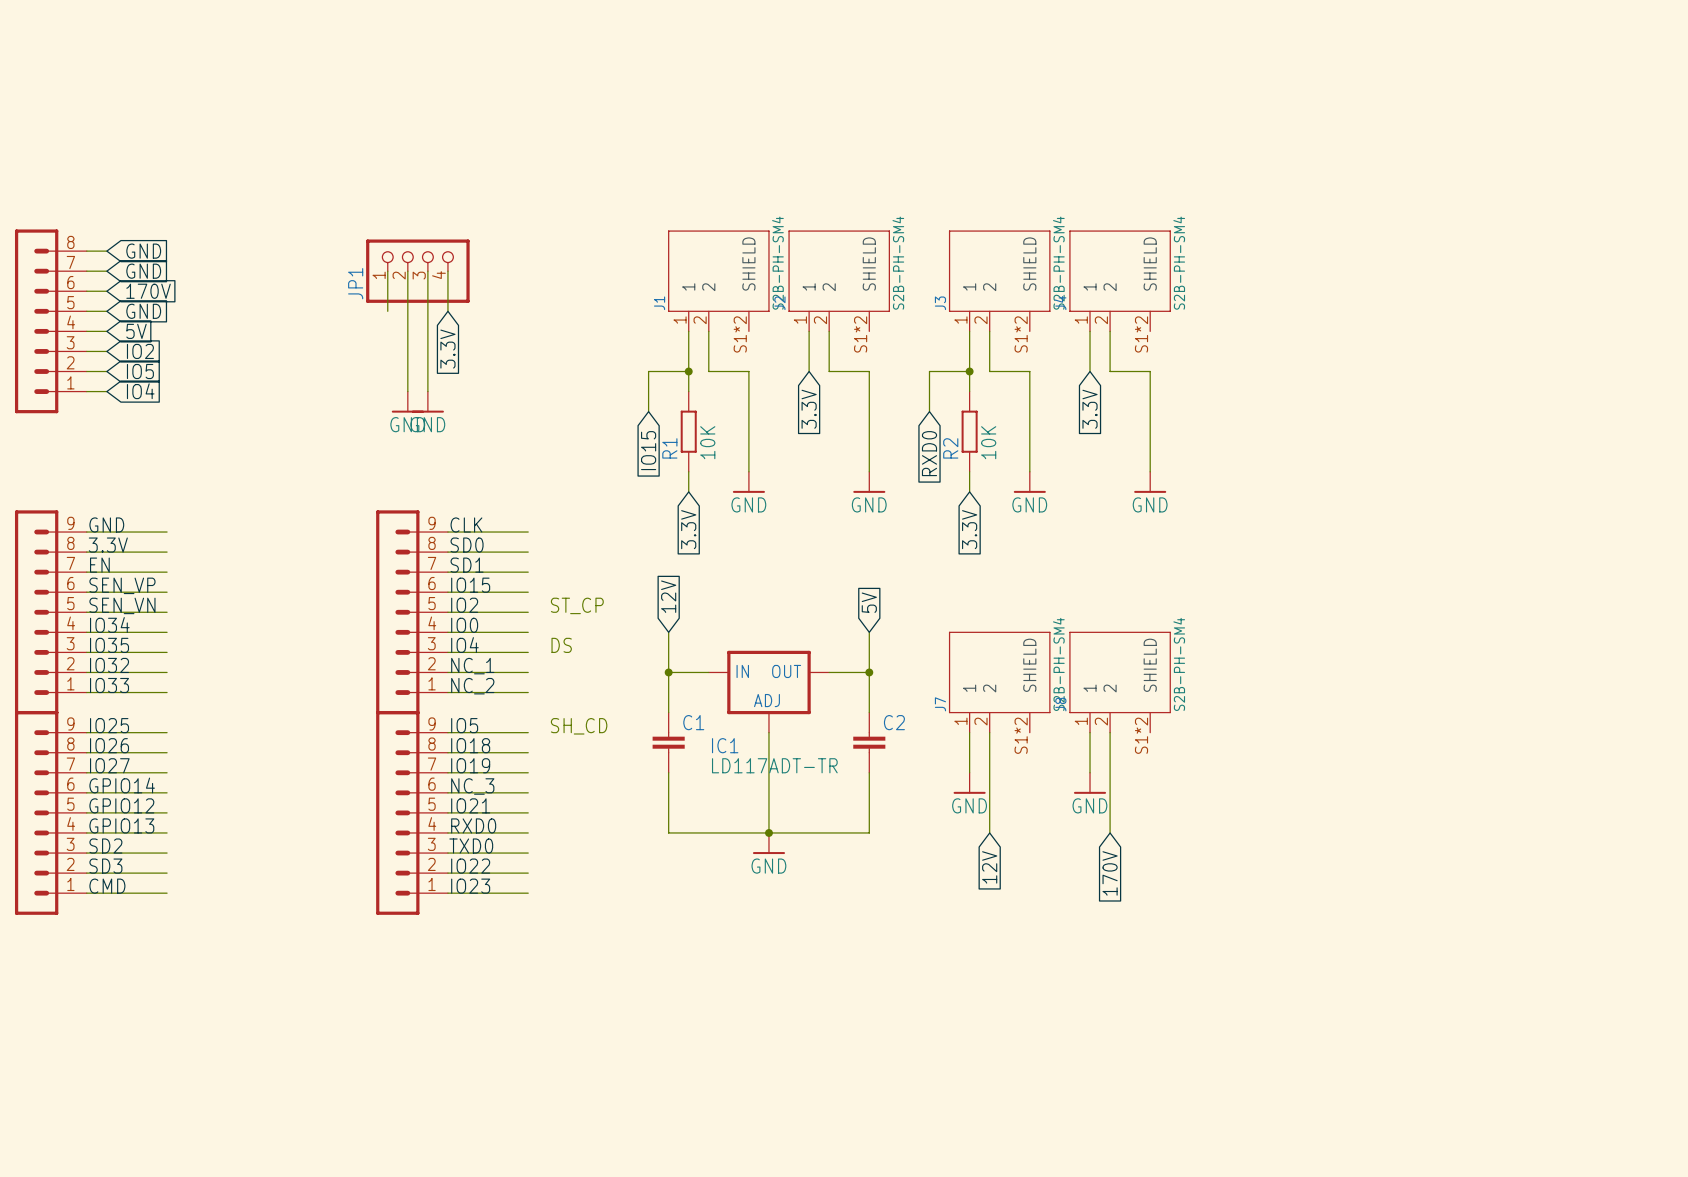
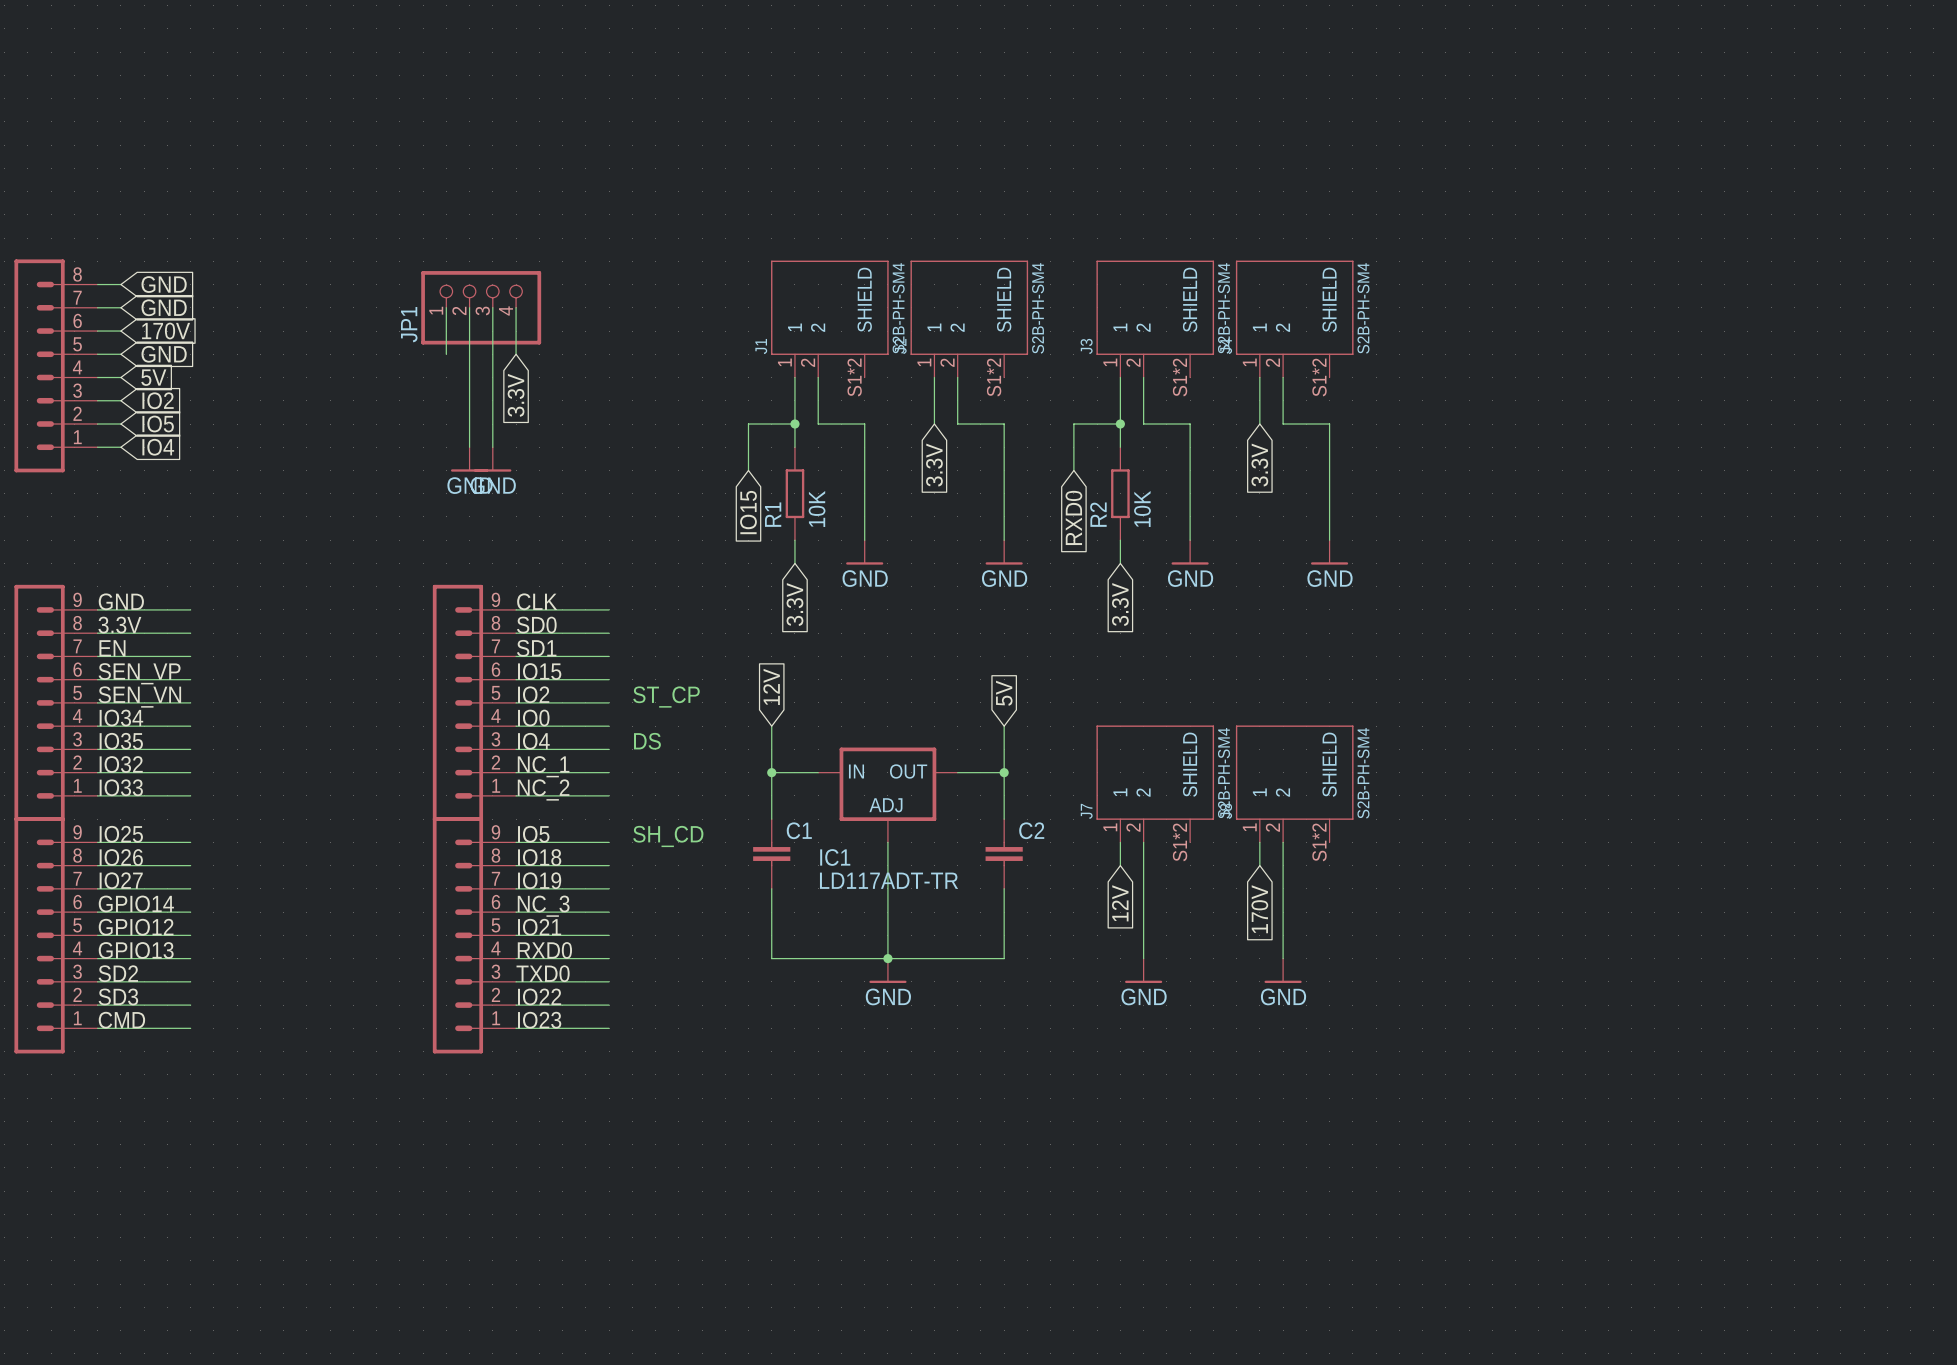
wire: (969, 752) (969, 772) -> none
wire: (1090, 752) (1090, 772) -> none
power symbol: GND (969, 783) -> none
power symbol: GND (1090, 783) -> none
power symbol: none -> GND (1143, 970)
power symbol: none -> GND (1283, 970)
global label position: 12V (989, 867) -> 12V (1120, 903)
global label position: 170V (1110, 873) -> 170V (1259, 909)

